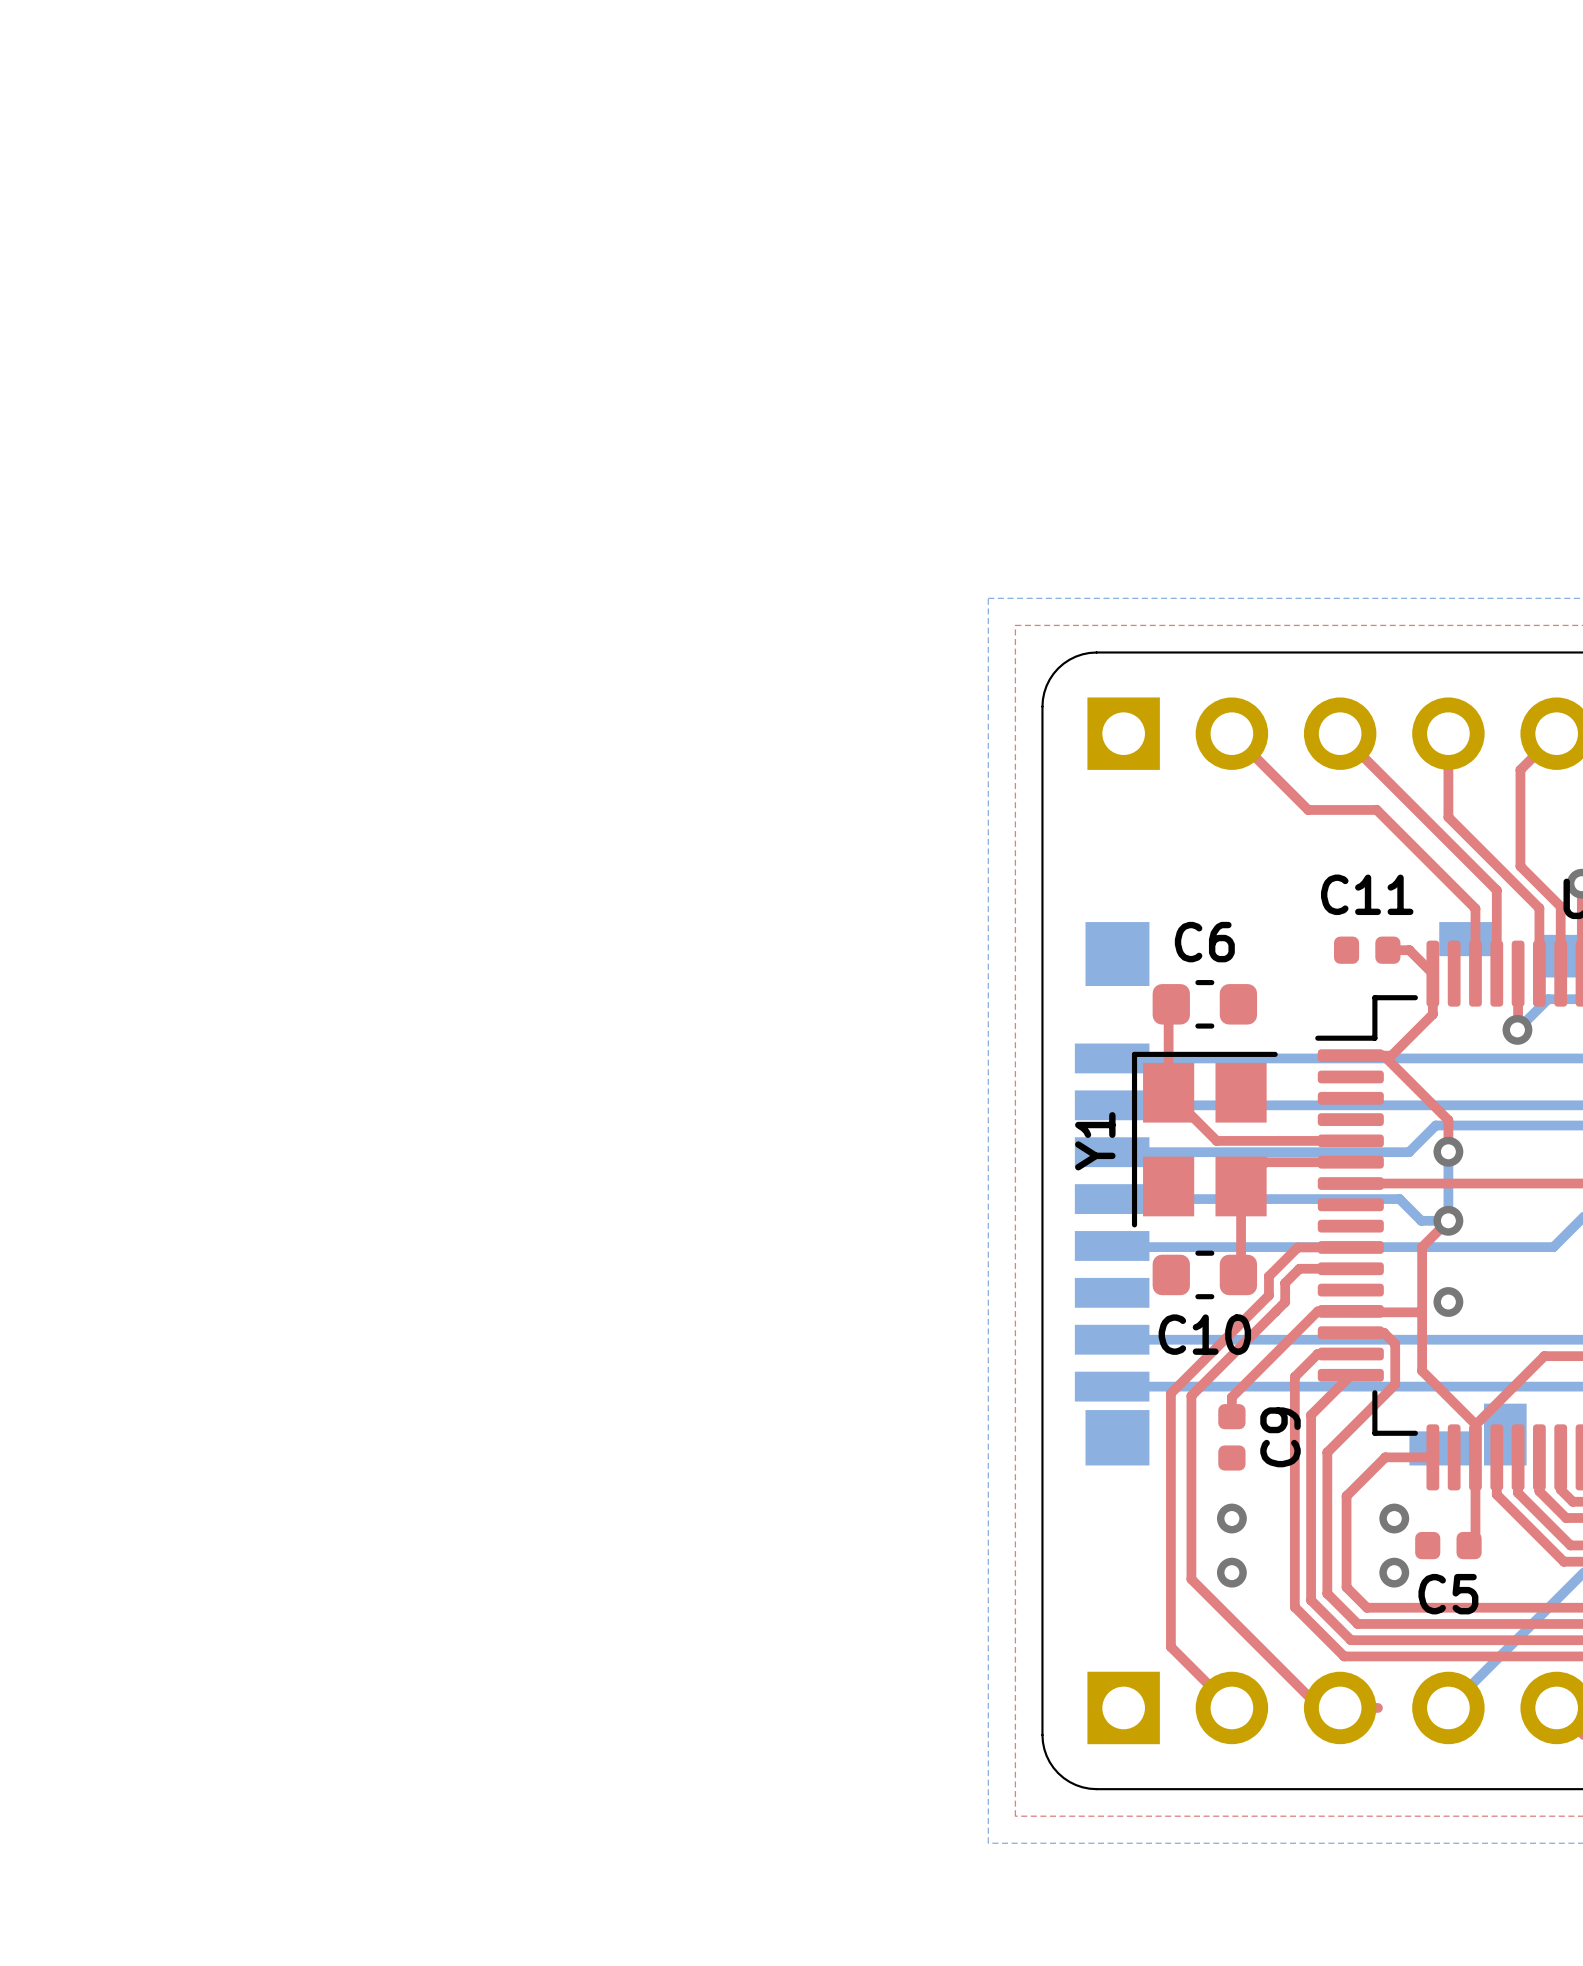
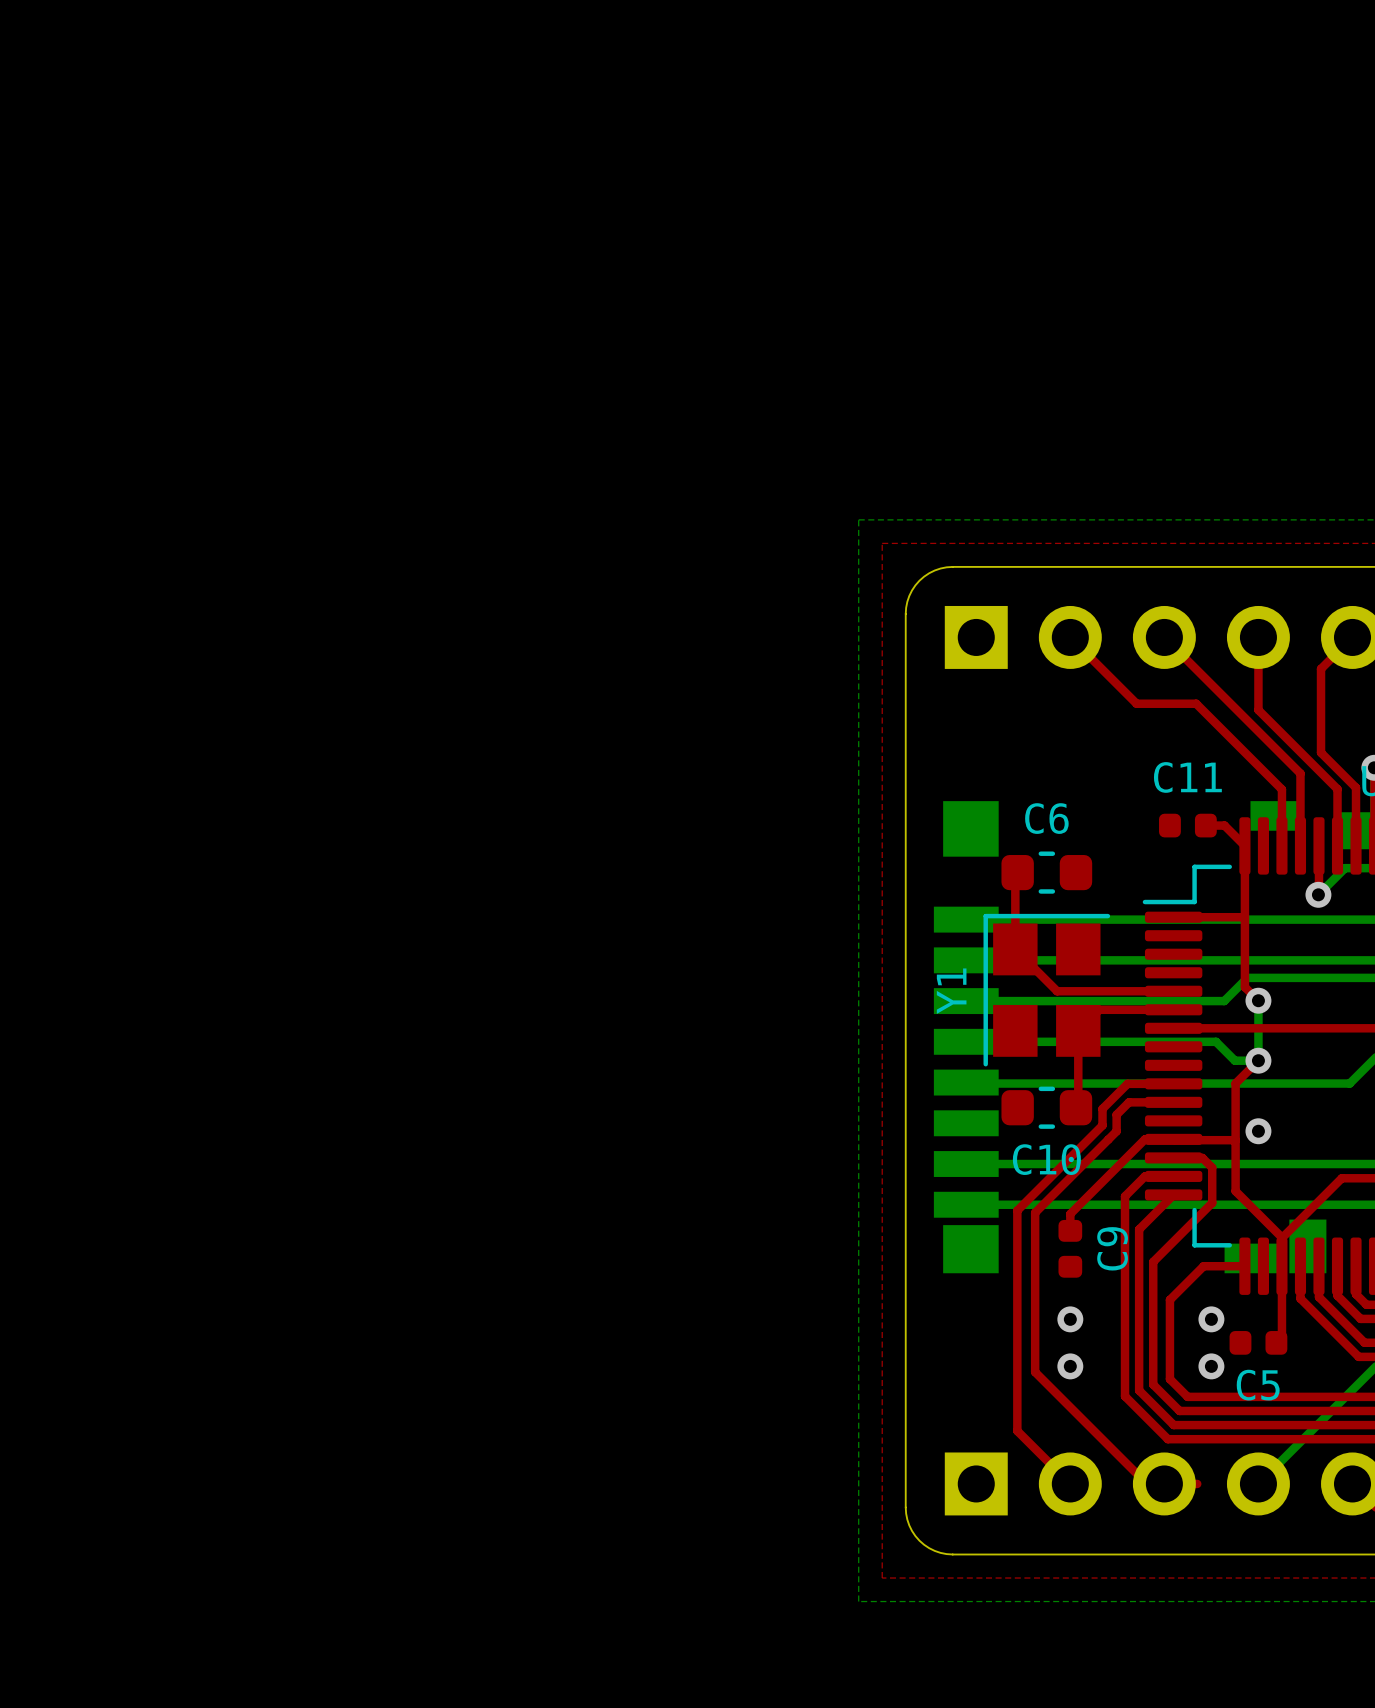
top track: (1432, 1014) (1391, 1055) -> (1244, 917) (1209, 917)
top track: (1383, 1055) (1448, 1120) (1448, 1151) -> (1244, 881) (1244, 987) (1258, 1000)

